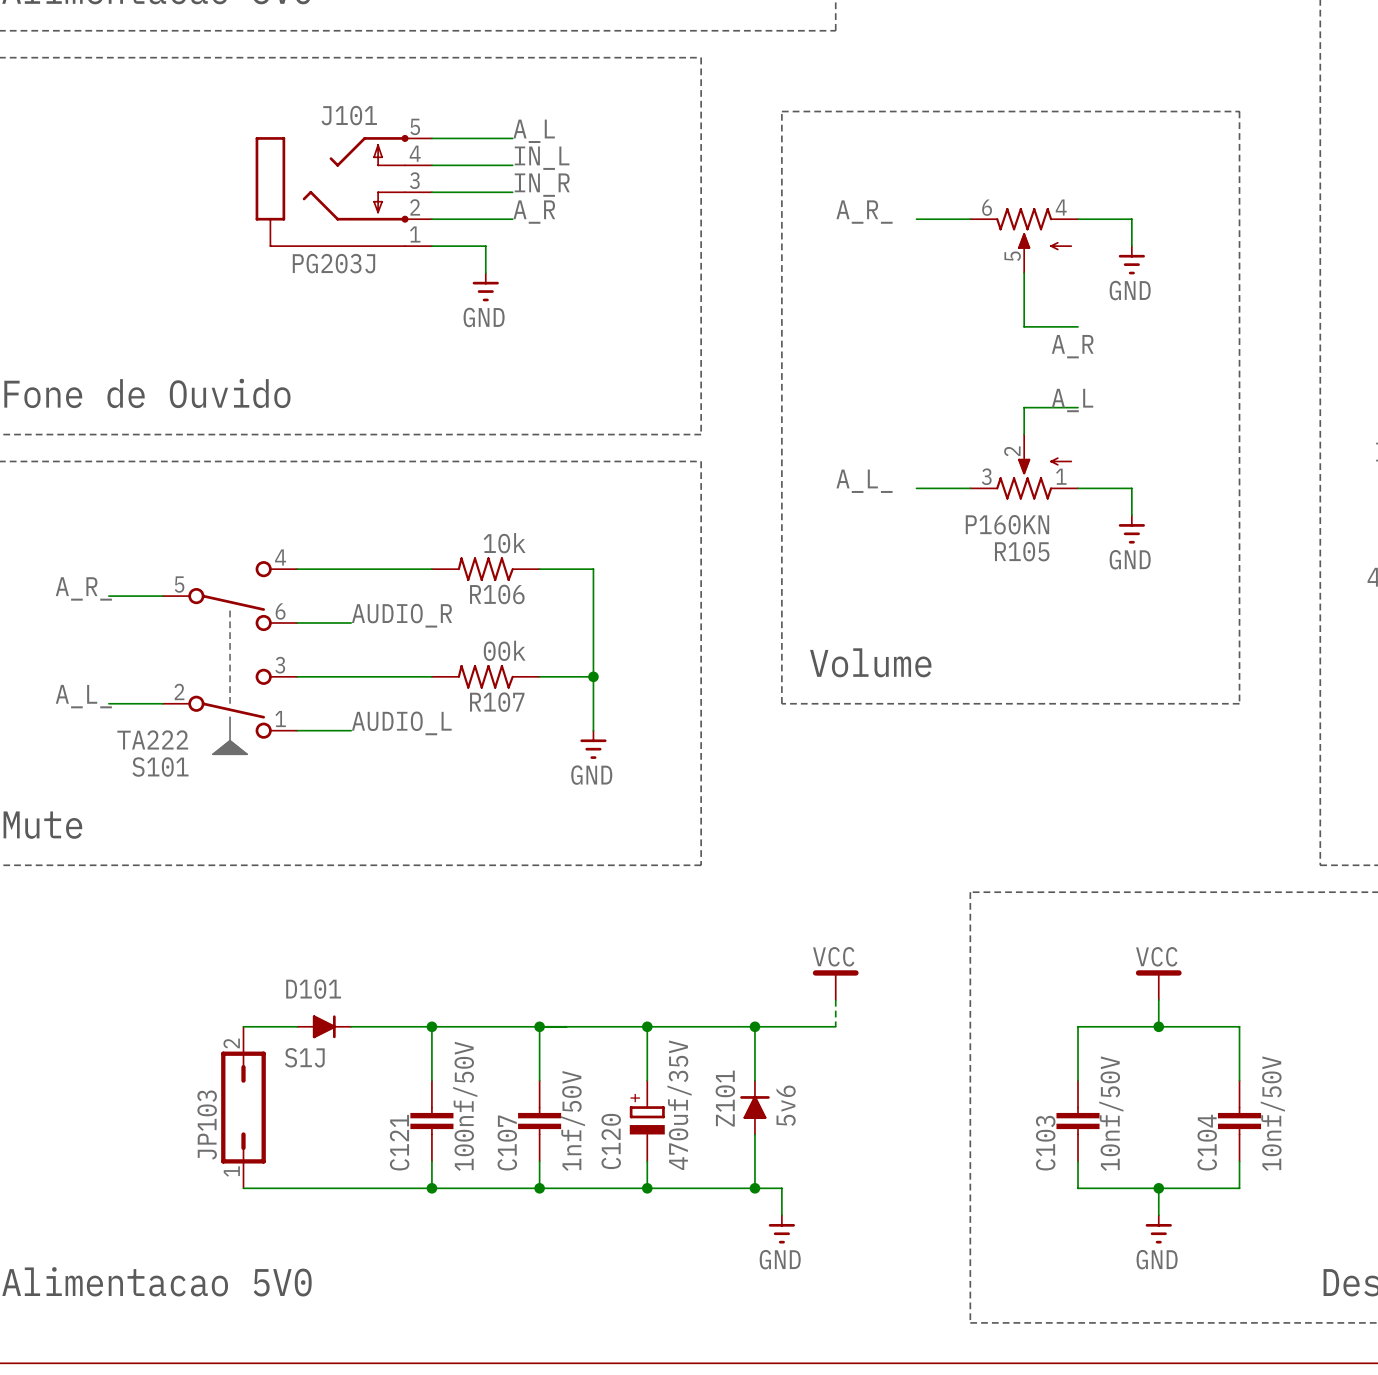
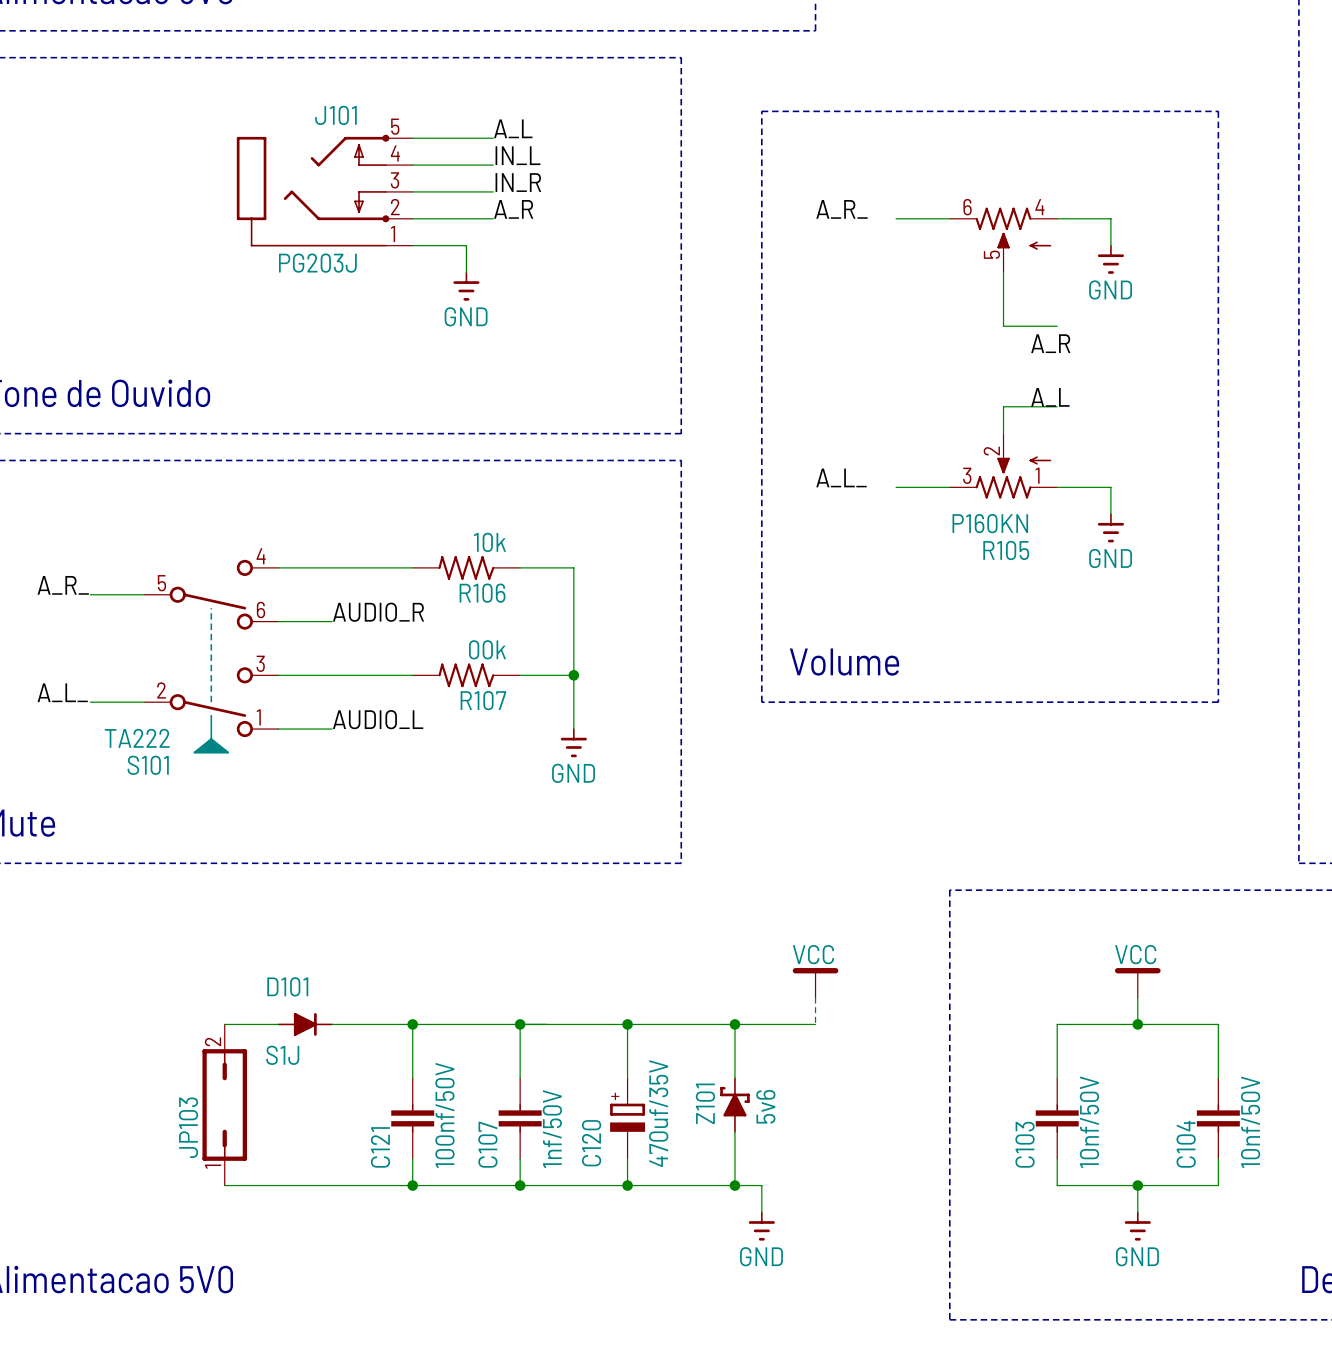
Z101 symbol: [740, 1079, 770, 1136] -> [720, 1077, 750, 1133]

